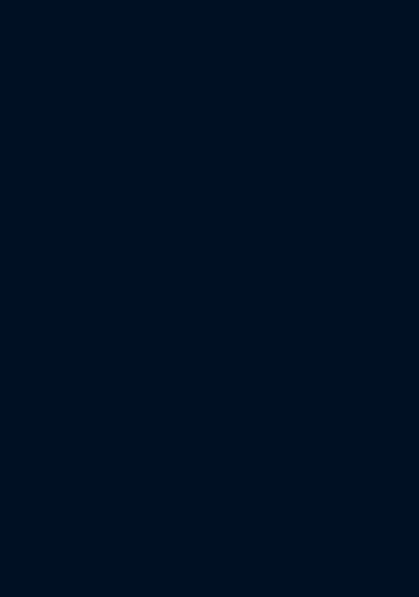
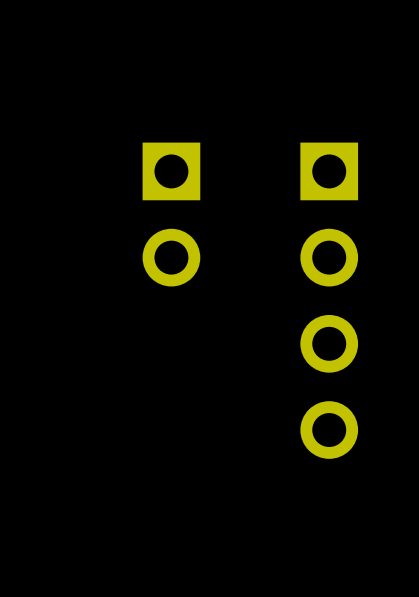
part: none -> (171, 214)
part: none -> (329, 300)

